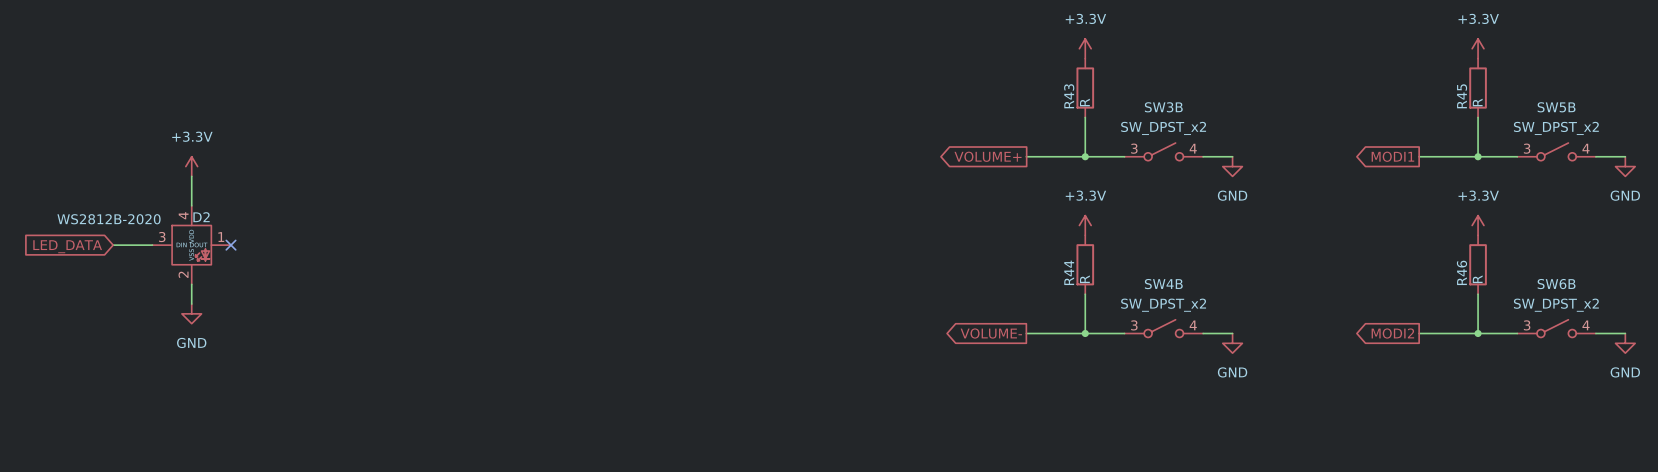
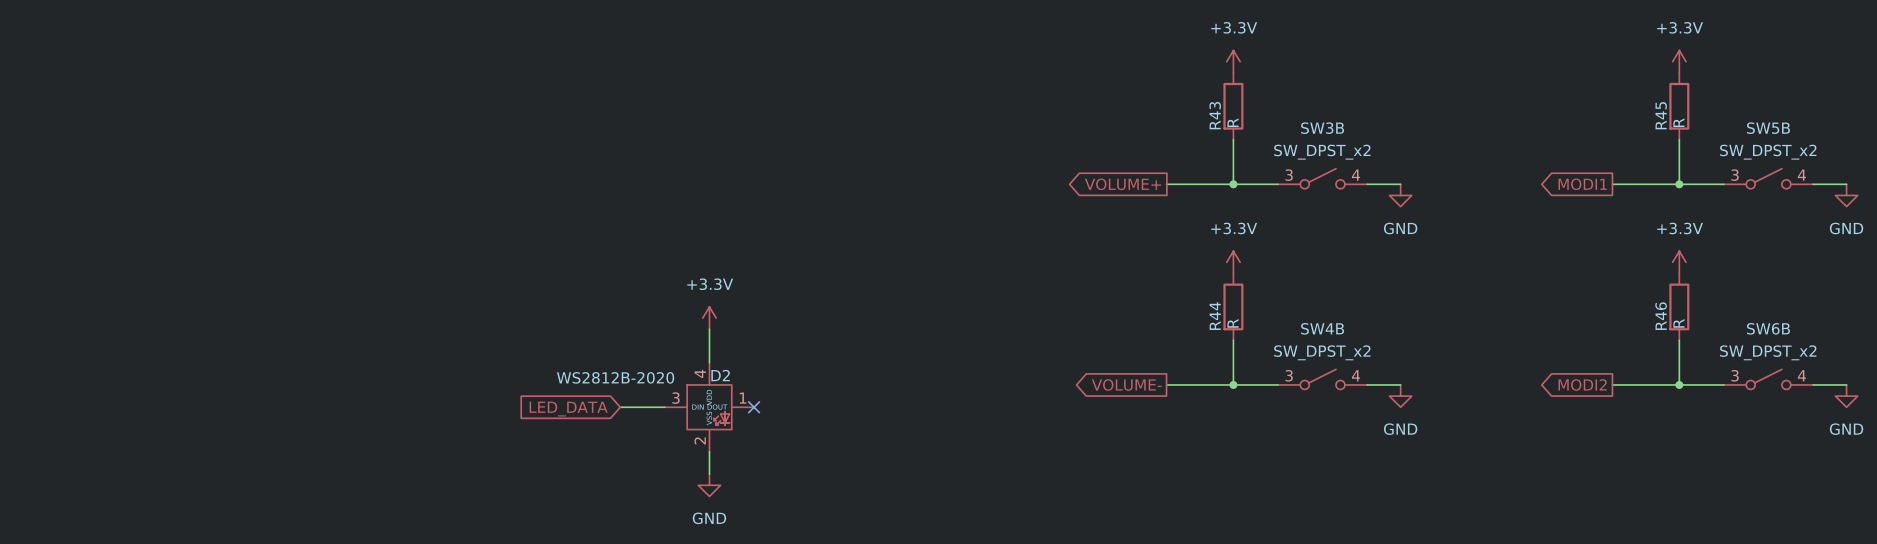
power symbol: +3.3V (191, 166) -> none
wire: (191, 176) (191, 205) -> none
wire: (113, 245) (152, 245) -> none
D2 position: (191, 245) -> (709, 407)
no-connect mark: (231, 245) -> none
global label: LED_DATA (67, 246) -> none
power symbol: none -> +3.3V (709, 318)
wire: (191, 284) (191, 304) -> none
wire: none -> (709, 329) (709, 362)
power symbol: GND (191, 313) -> none
wire: none -> (620, 407) (664, 407)
no-connect mark: none -> (754, 407)
global label: none -> LED_DATA (568, 409)
wire: none -> (709, 451) (709, 474)
power symbol: none -> GND (709, 485)

